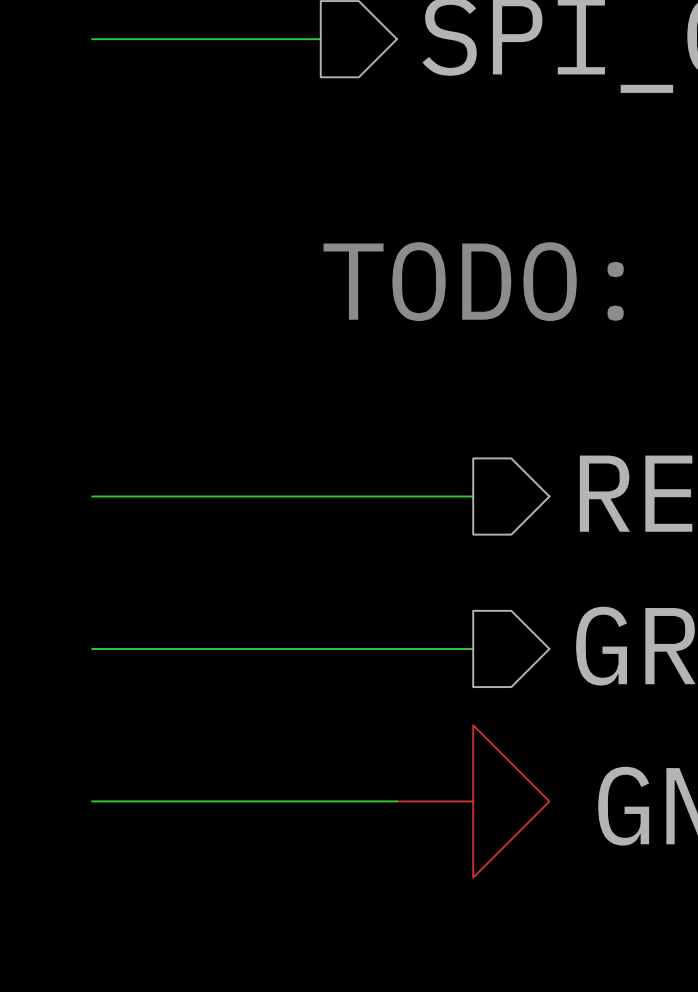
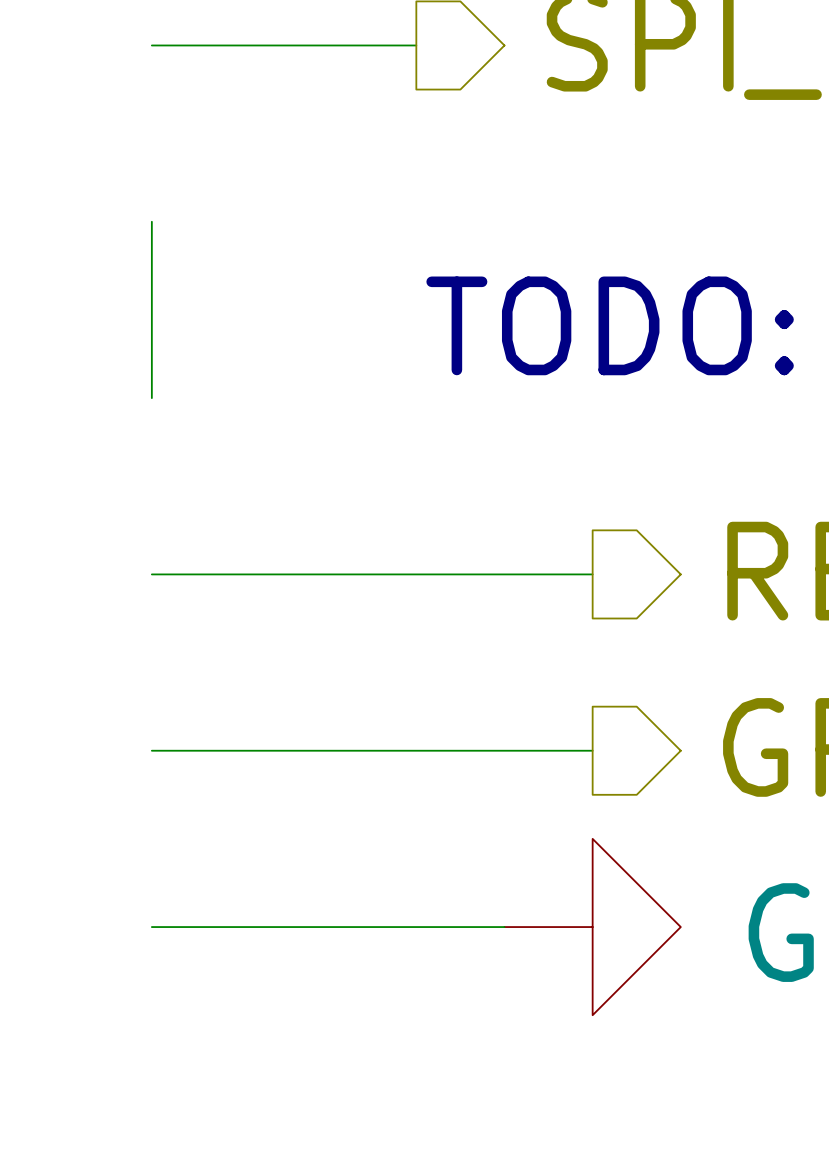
wire: none -> (151, 221) (151, 398)

